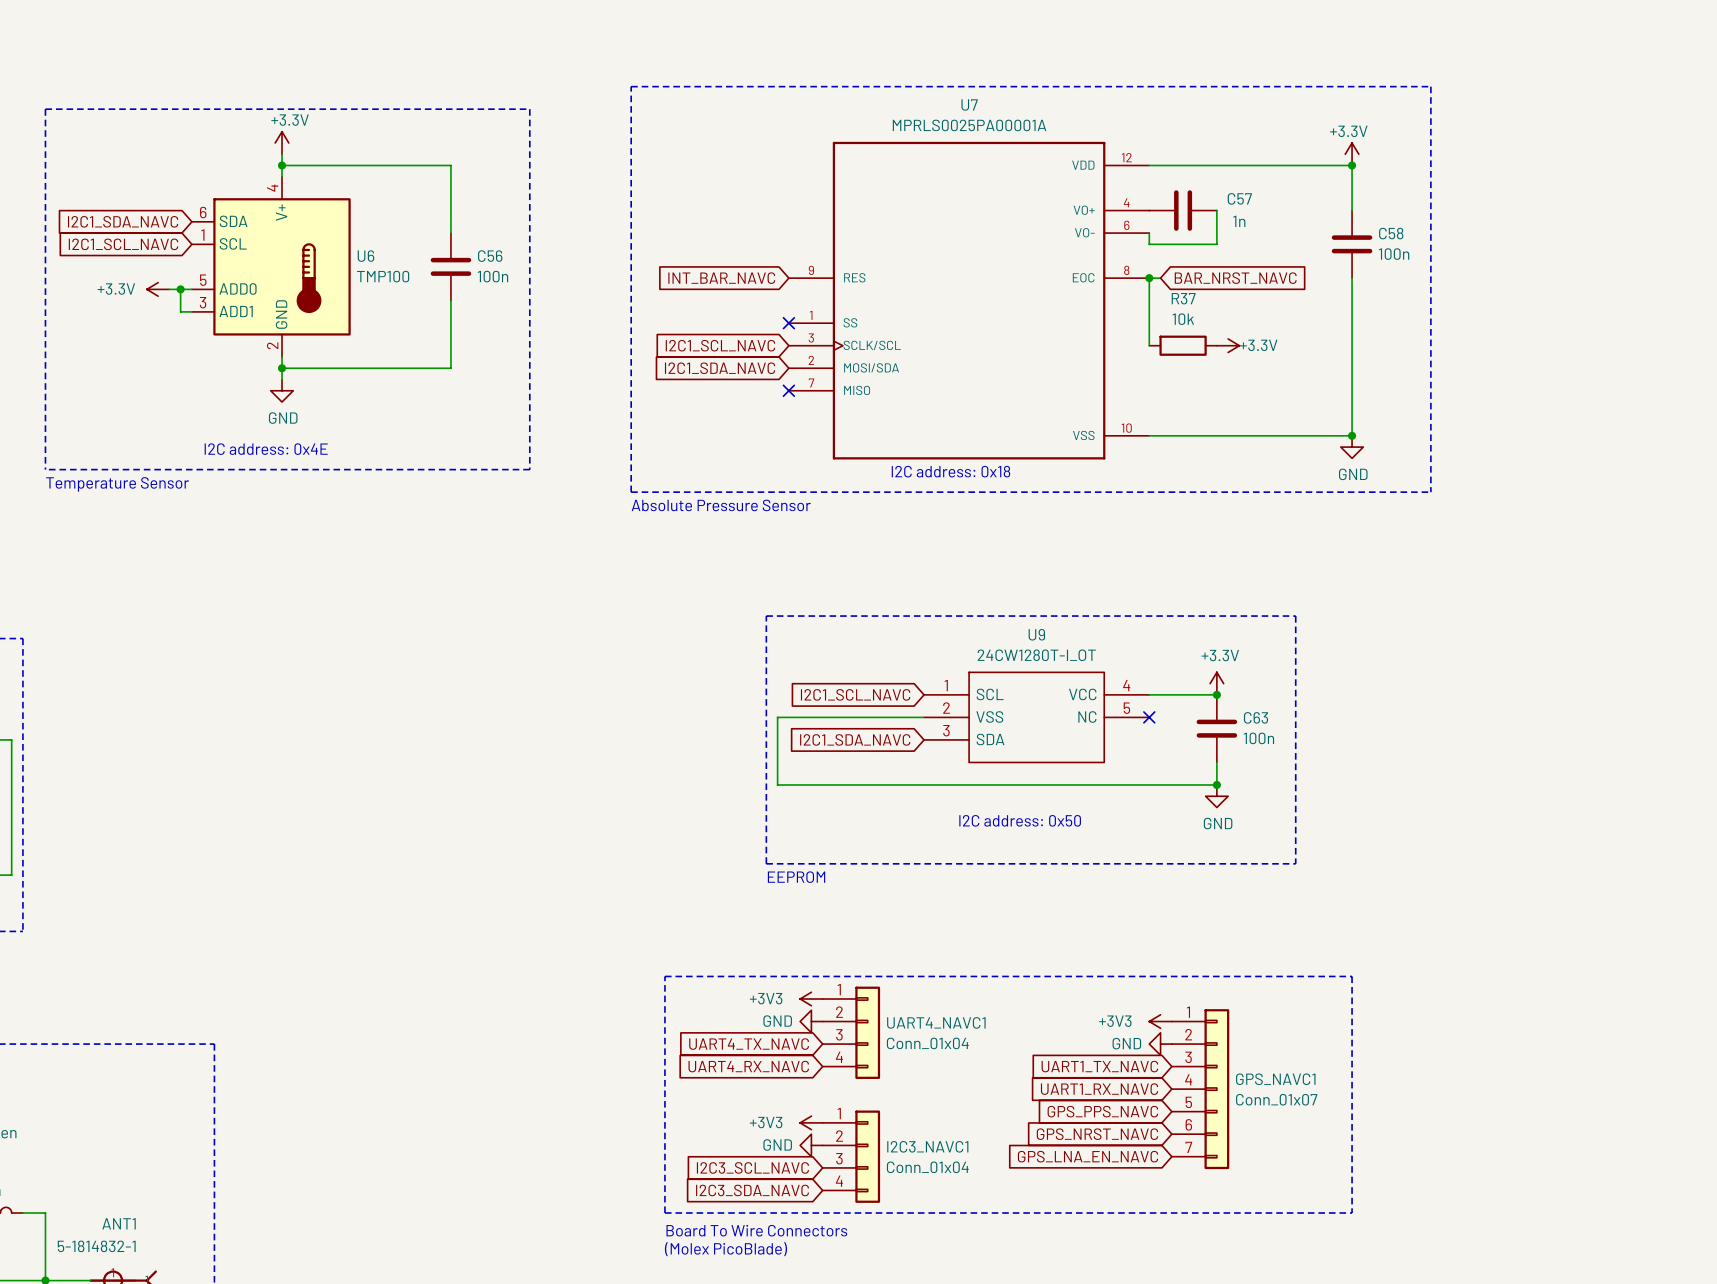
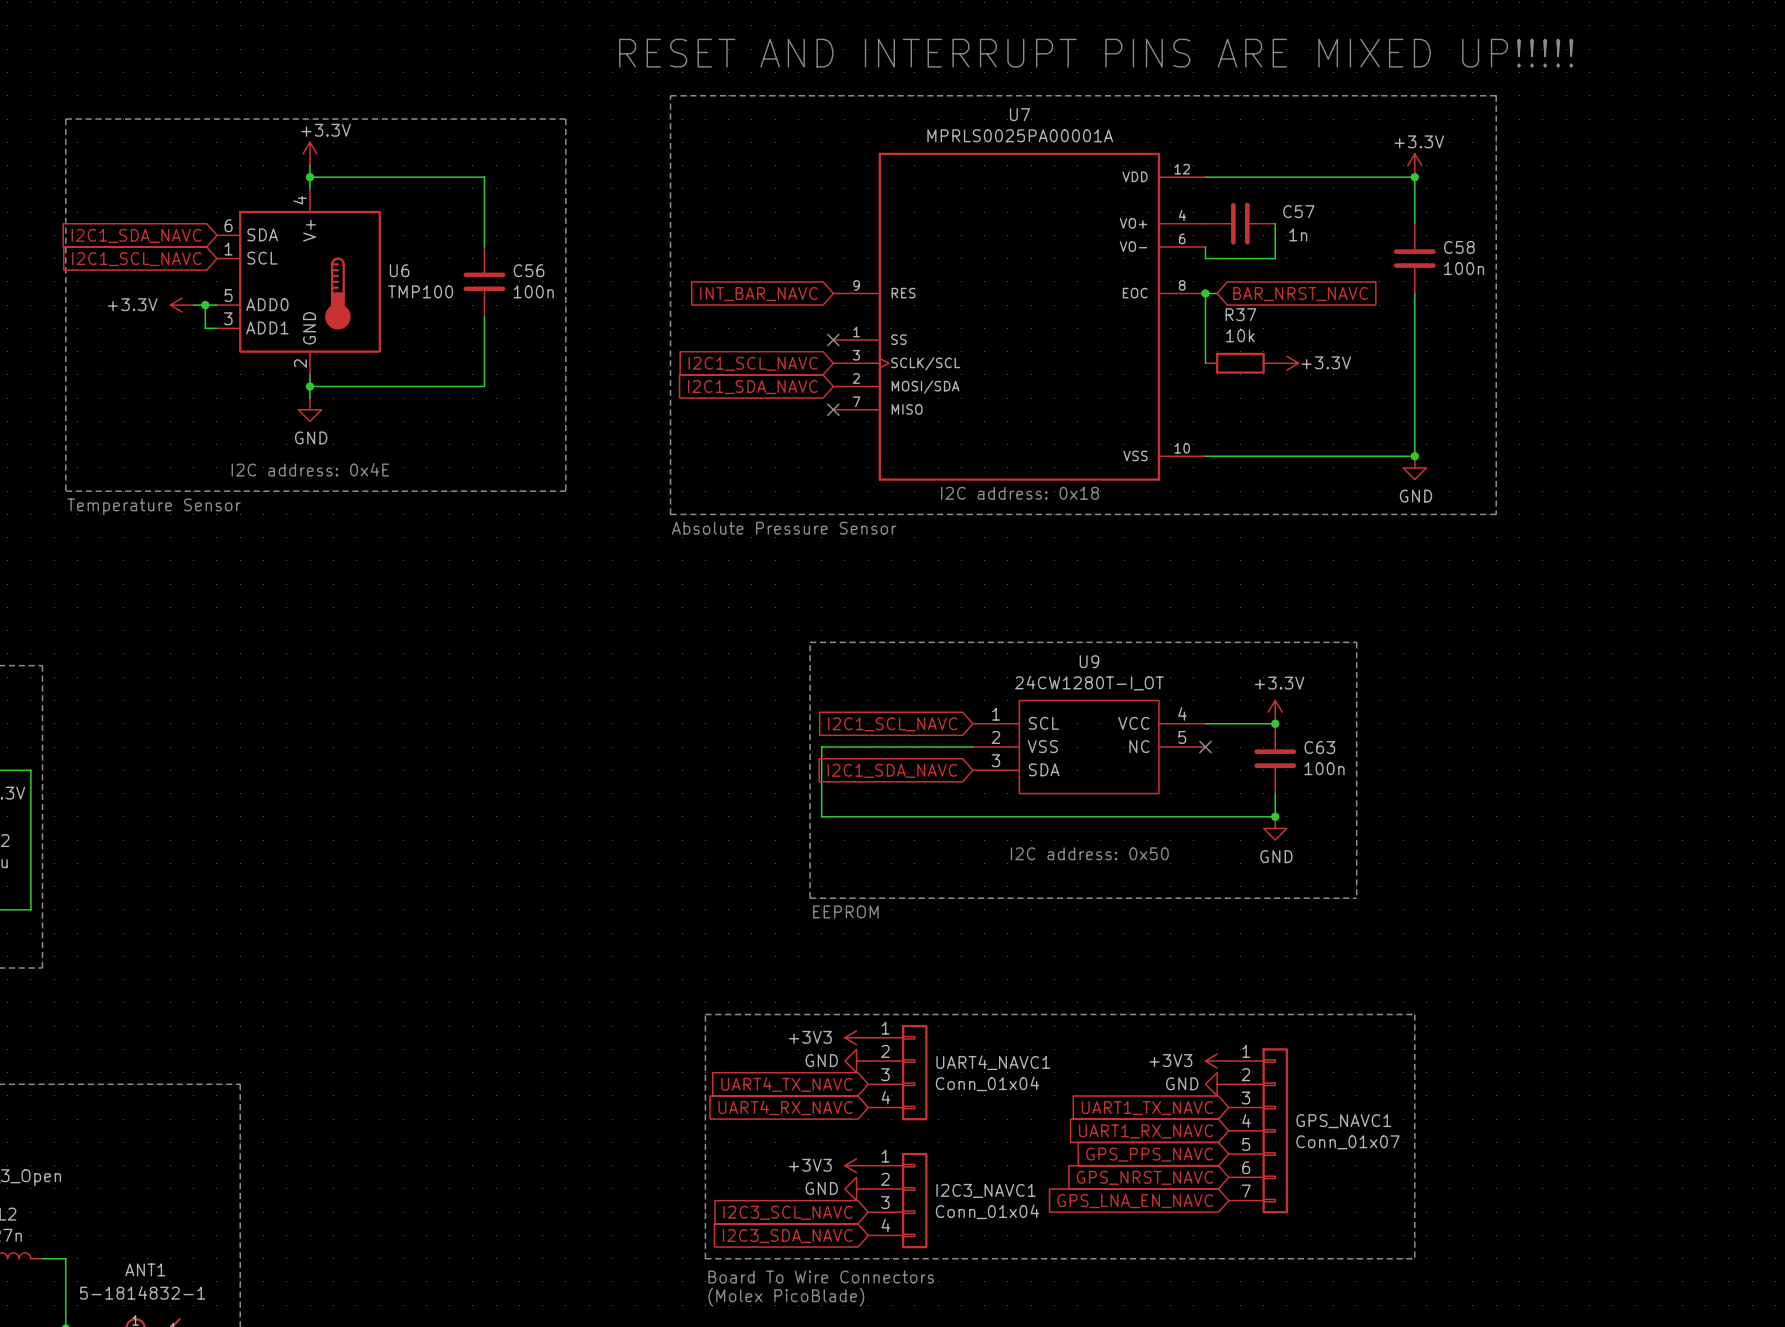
text: none -> RESET AND INTERRUPT PINS ARE MIXED UP!!!!! (1096, 53)

